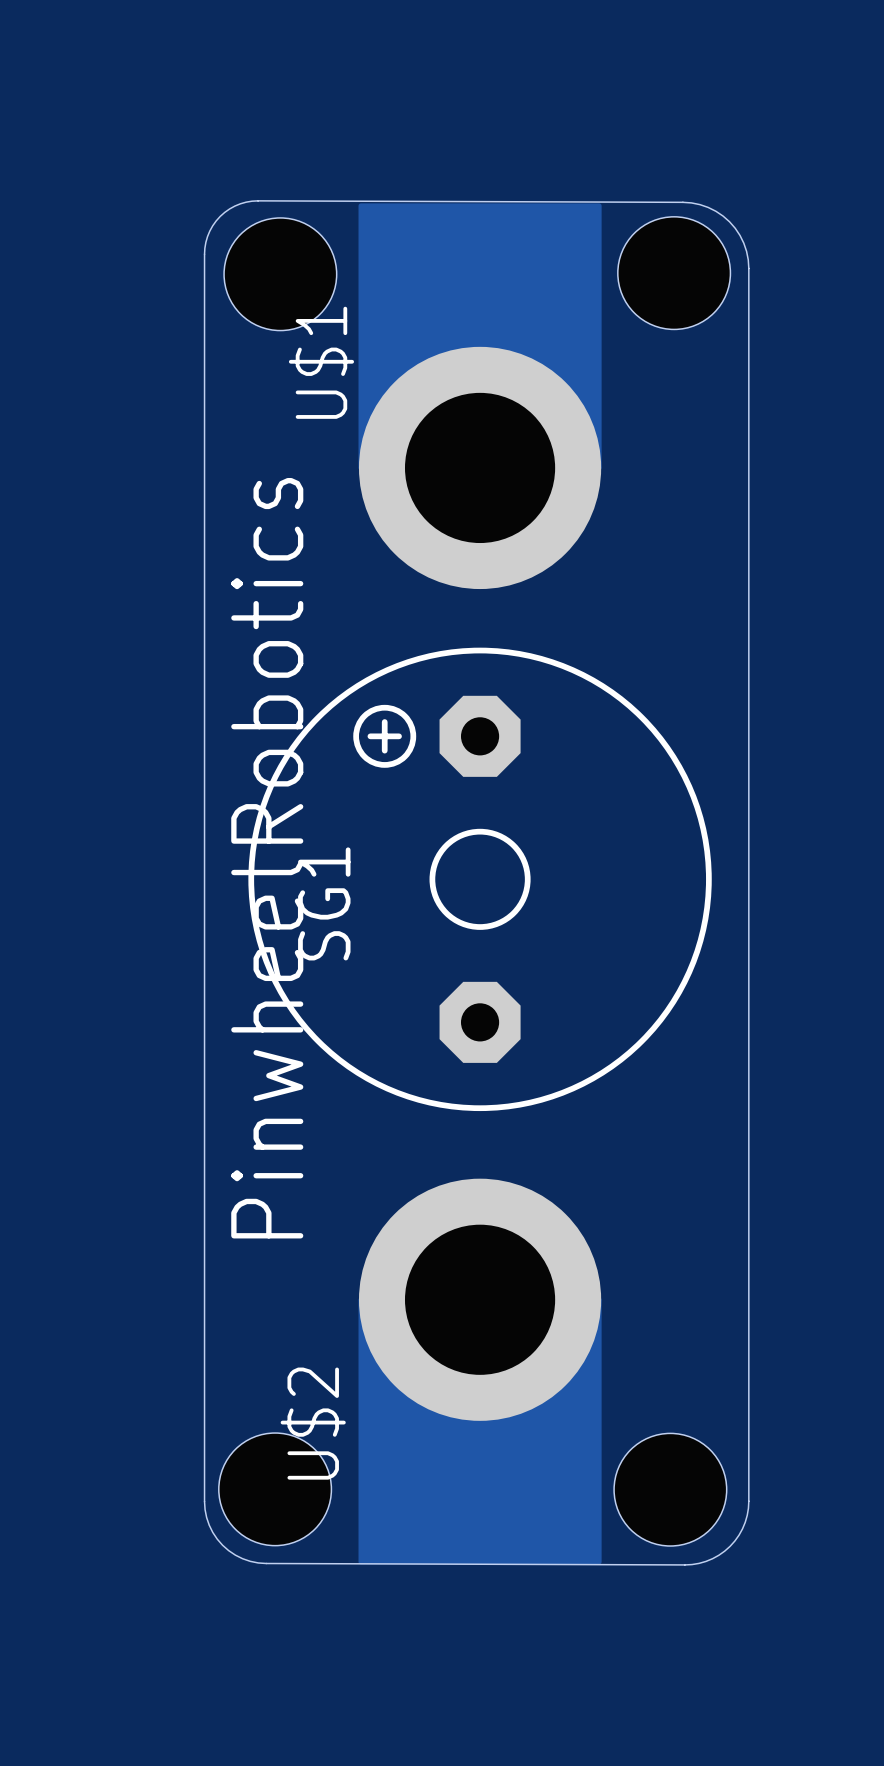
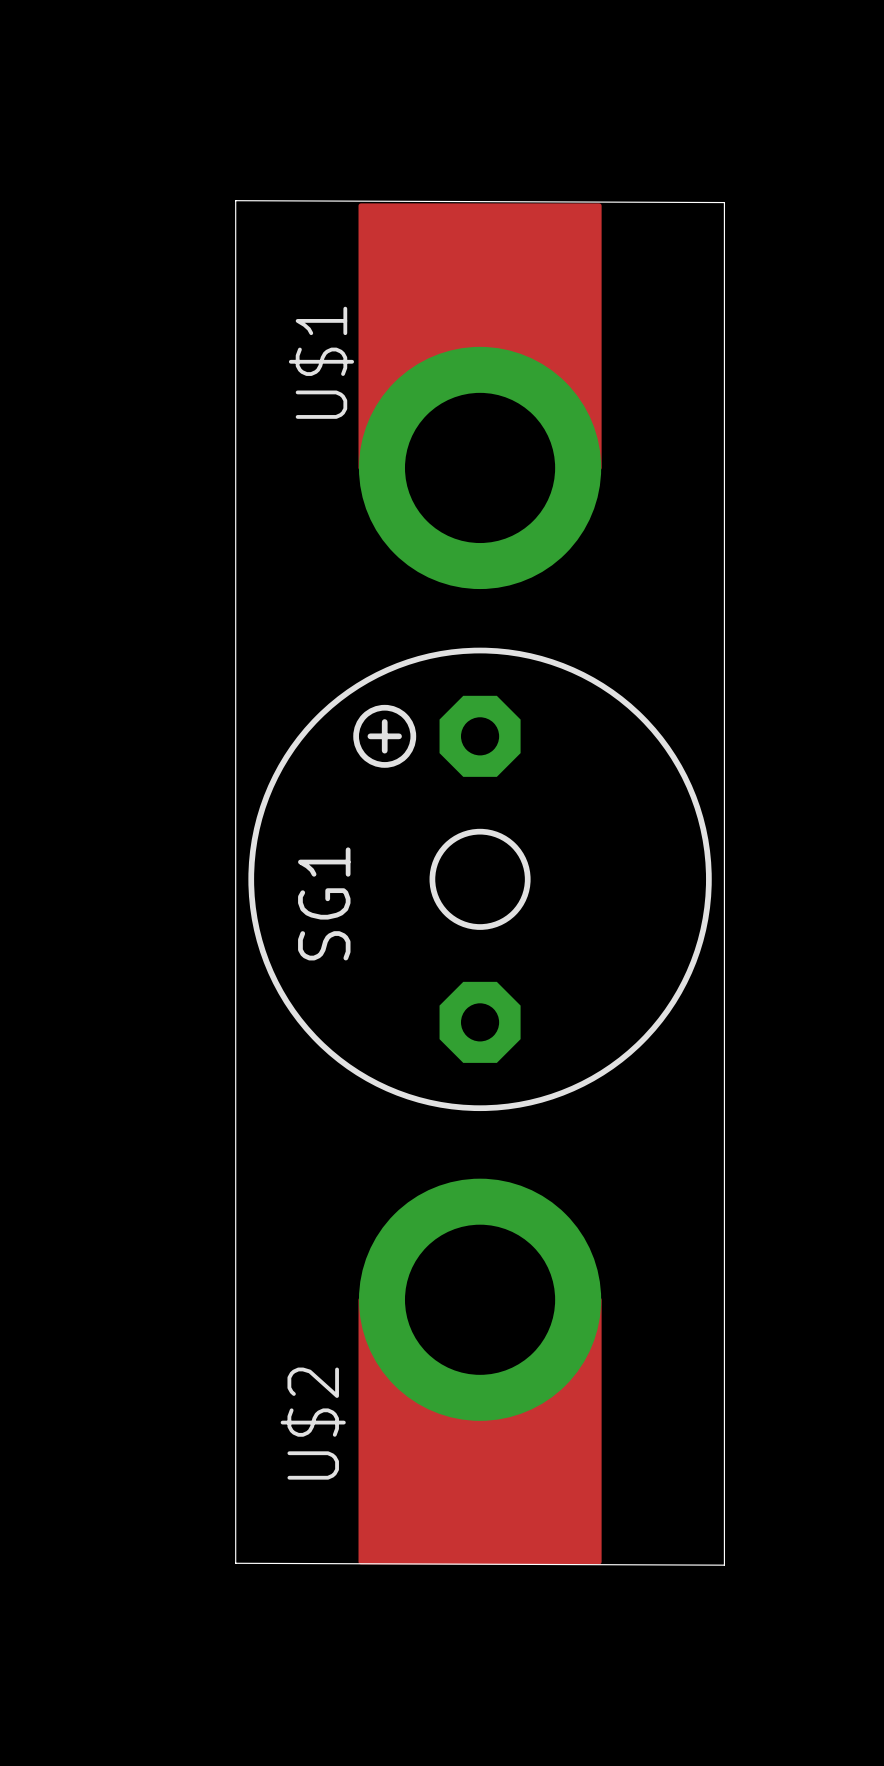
board edge: (258, 200) (691, 202) (708, 207) (729, 221) (740, 235) (746, 251) (748, 268) (748, 1501) (745, 1522) (734, 1541) (724, 1551) (705, 1561) (684, 1564) (258, 1562) (235, 1555) (222, 1545) (212, 1532) (206, 1517) (204, 1501) (204, 254) (209, 231) (220, 216) (234, 206) (258, 200) -> (235, 200) (235, 1563) (724, 1565) (724, 202) (235, 200)
hole: (674, 273) -> none
hole: (280, 274) -> none
text: PinwheelRobotics (267, 858) -> none
hole: (275, 1489) -> none
hole: (670, 1489) -> none

